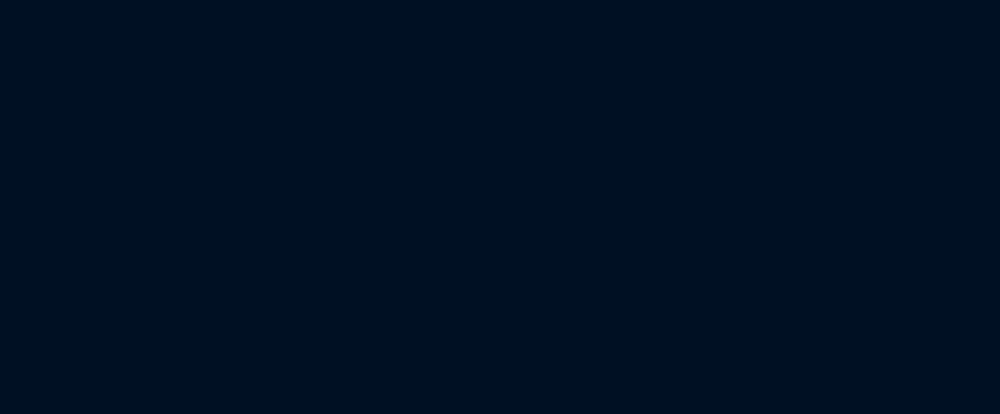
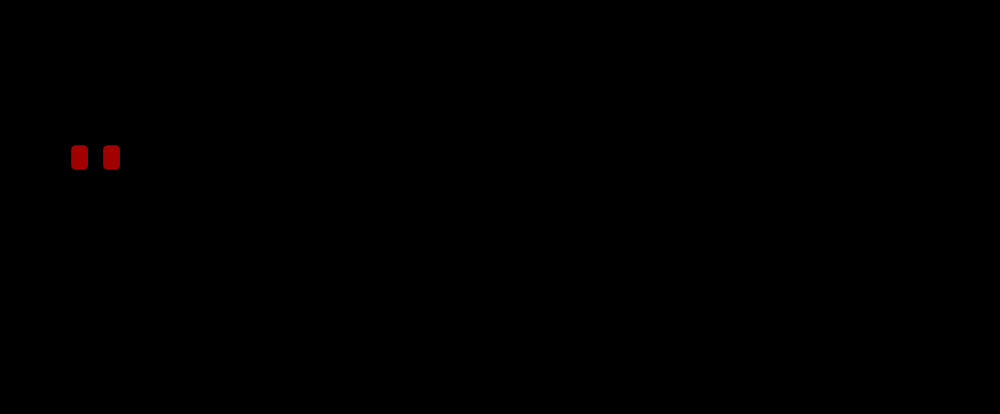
part: none -> (95, 157)

